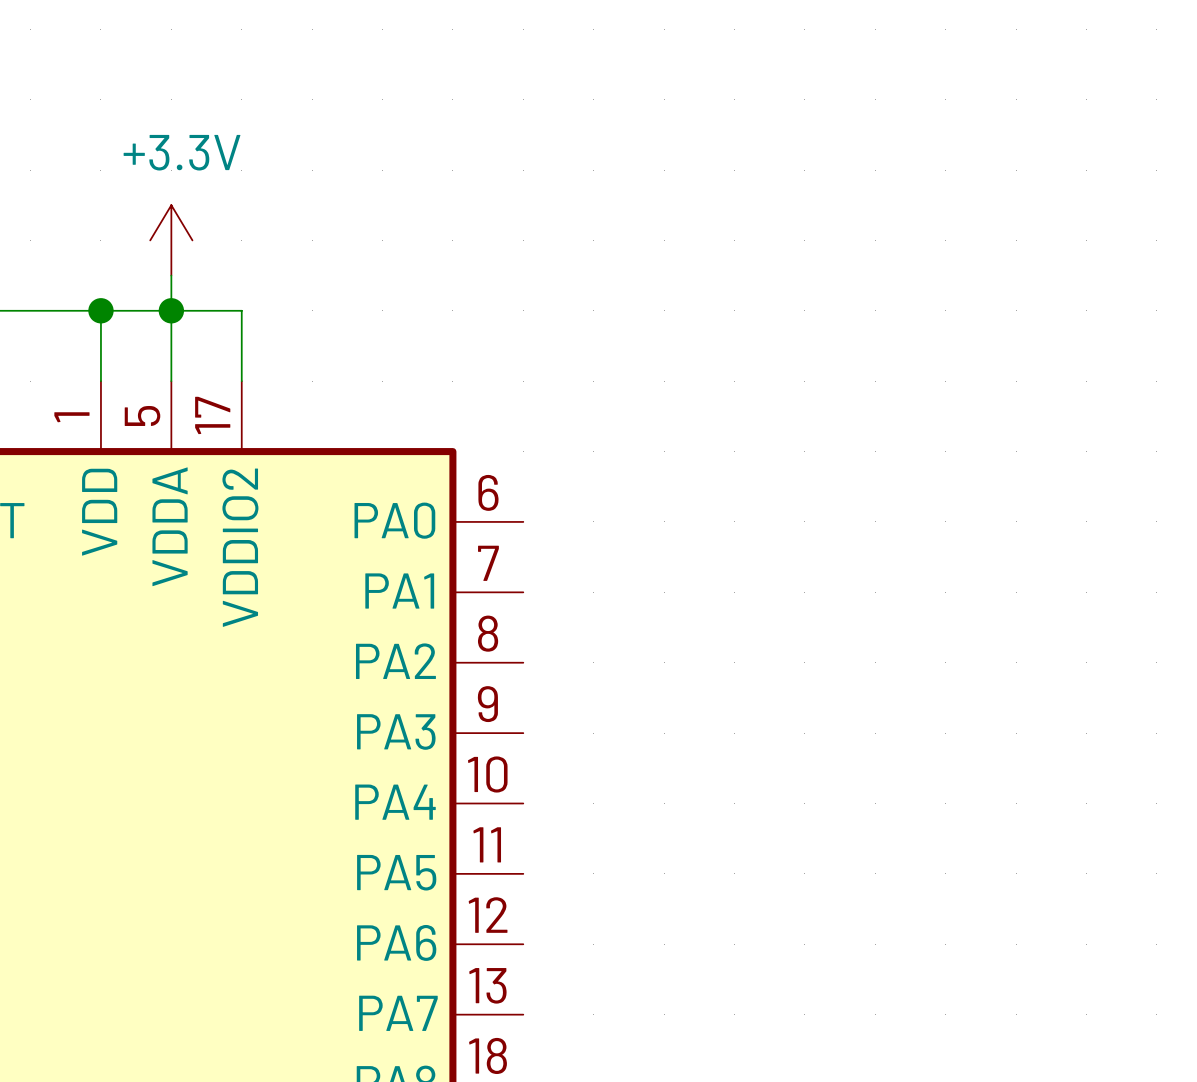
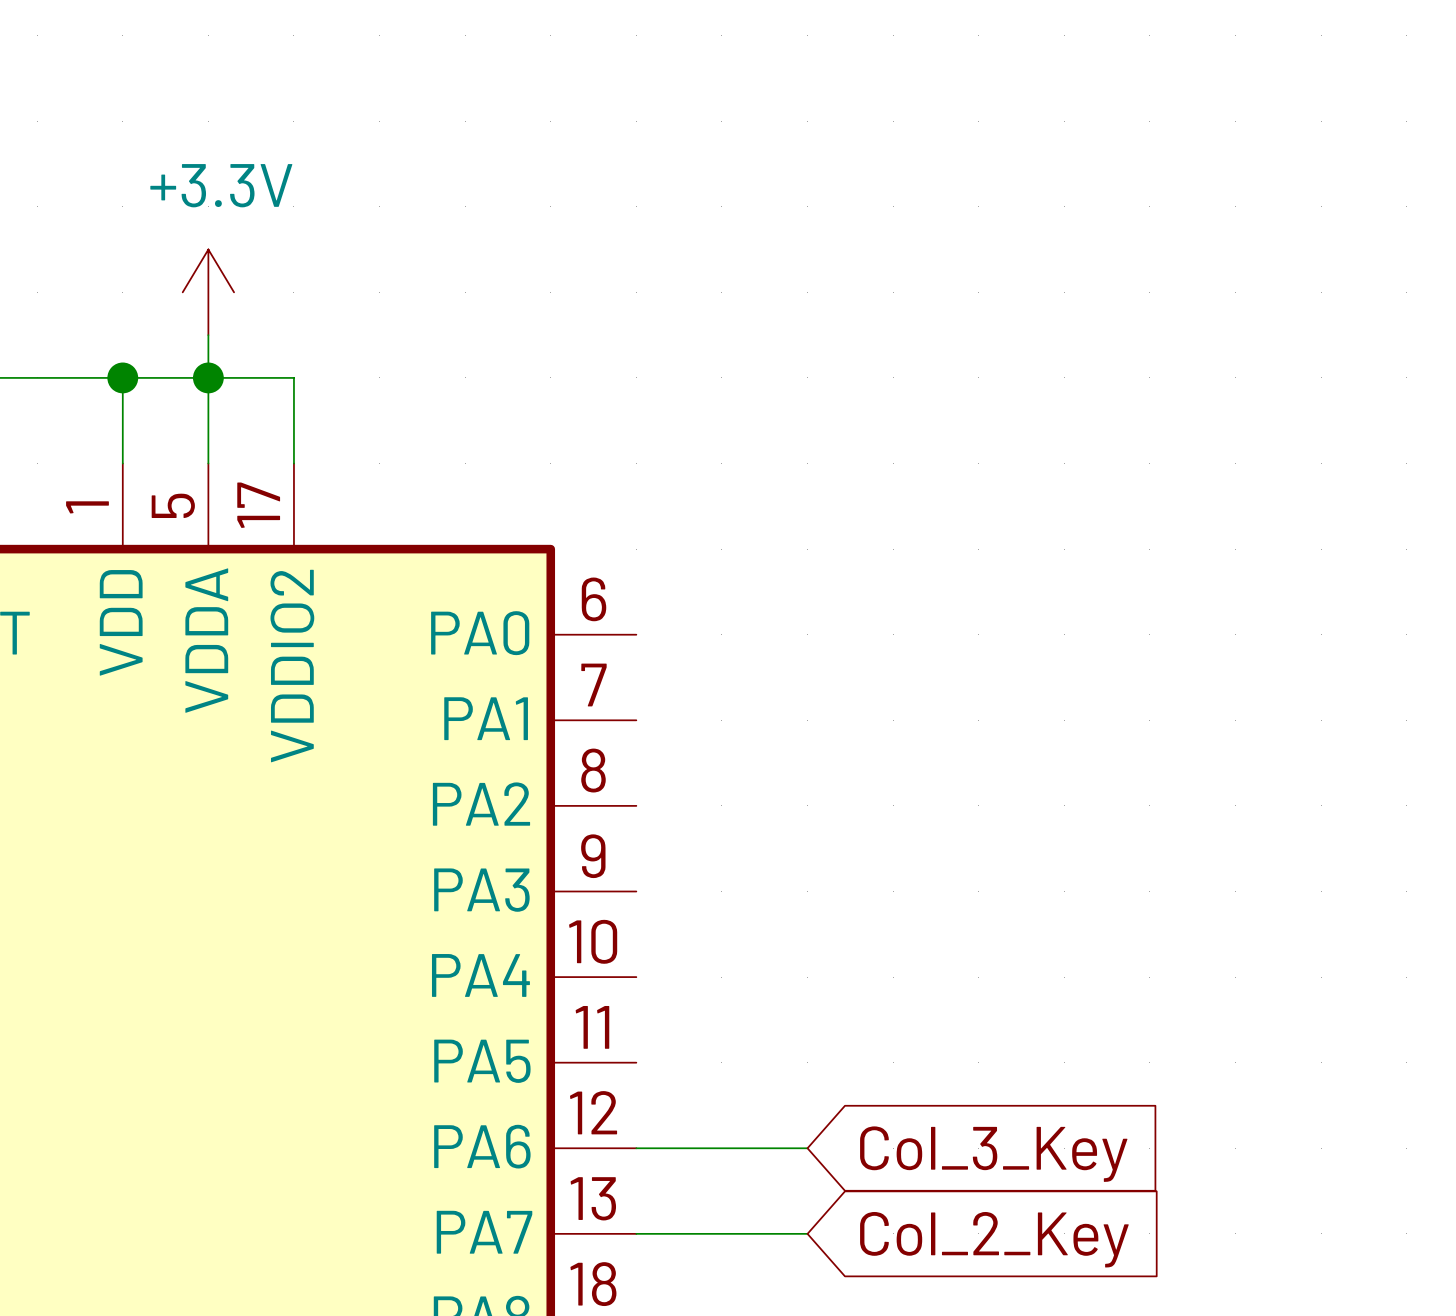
wire: none -> (636, 1148) (807, 1148)
global label: none -> Col_3_Key (993, 1154)
wire: none -> (636, 1233) (807, 1233)
global label: none -> Col_2_Key (994, 1239)

